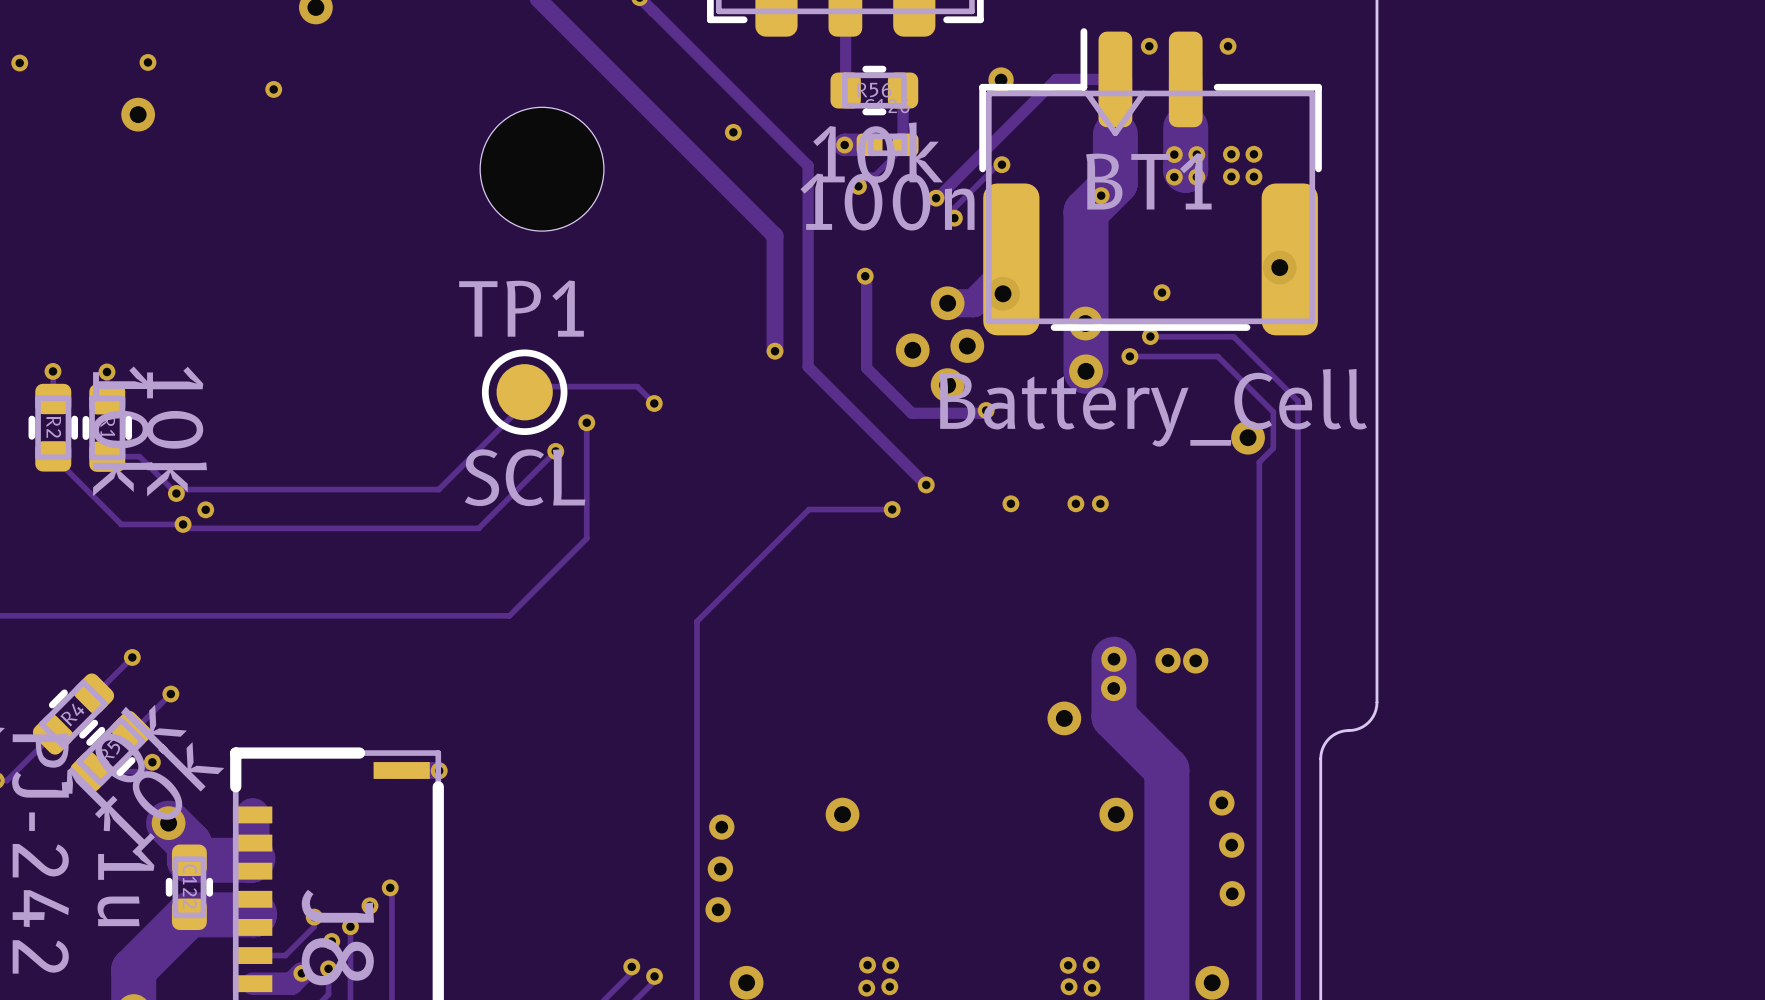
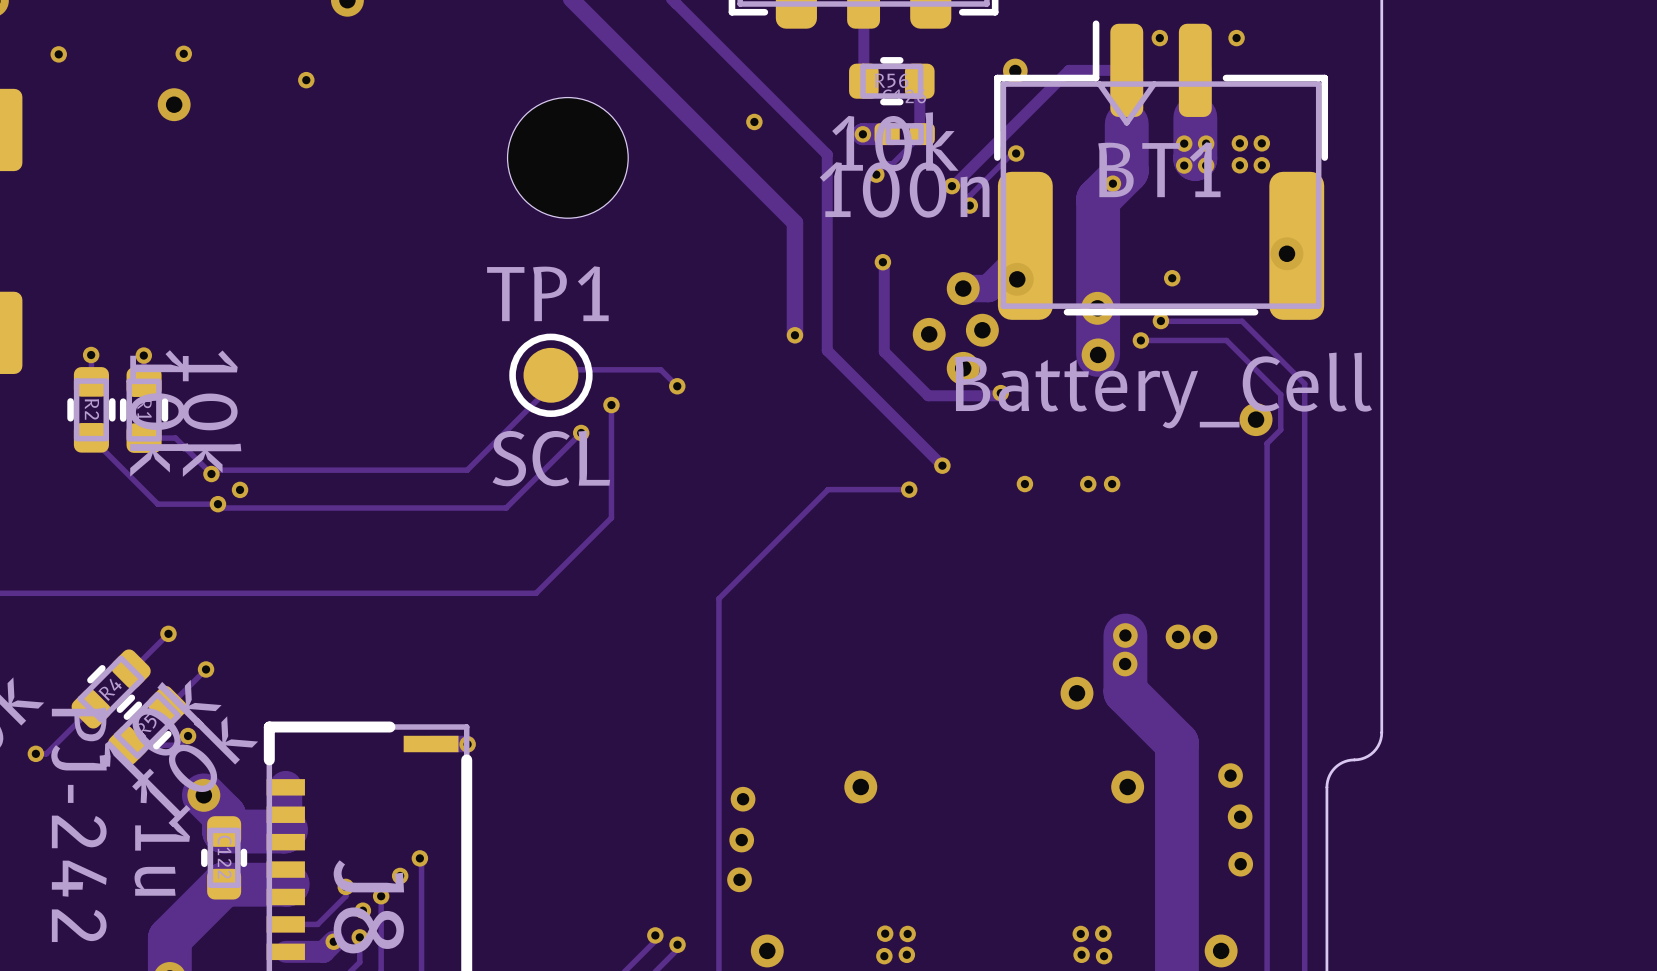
board edge: (1376, 702) (1374, 713) (1365, 724) (1356, 729) (1336, 733) (1328, 738) (1323, 746) (1320, 758) (1320, 814) -> (1381, 677) (1381, 732) (1378, 746) (1364, 757) (1345, 761) (1337, 765) (1329, 775) (1326, 787)

